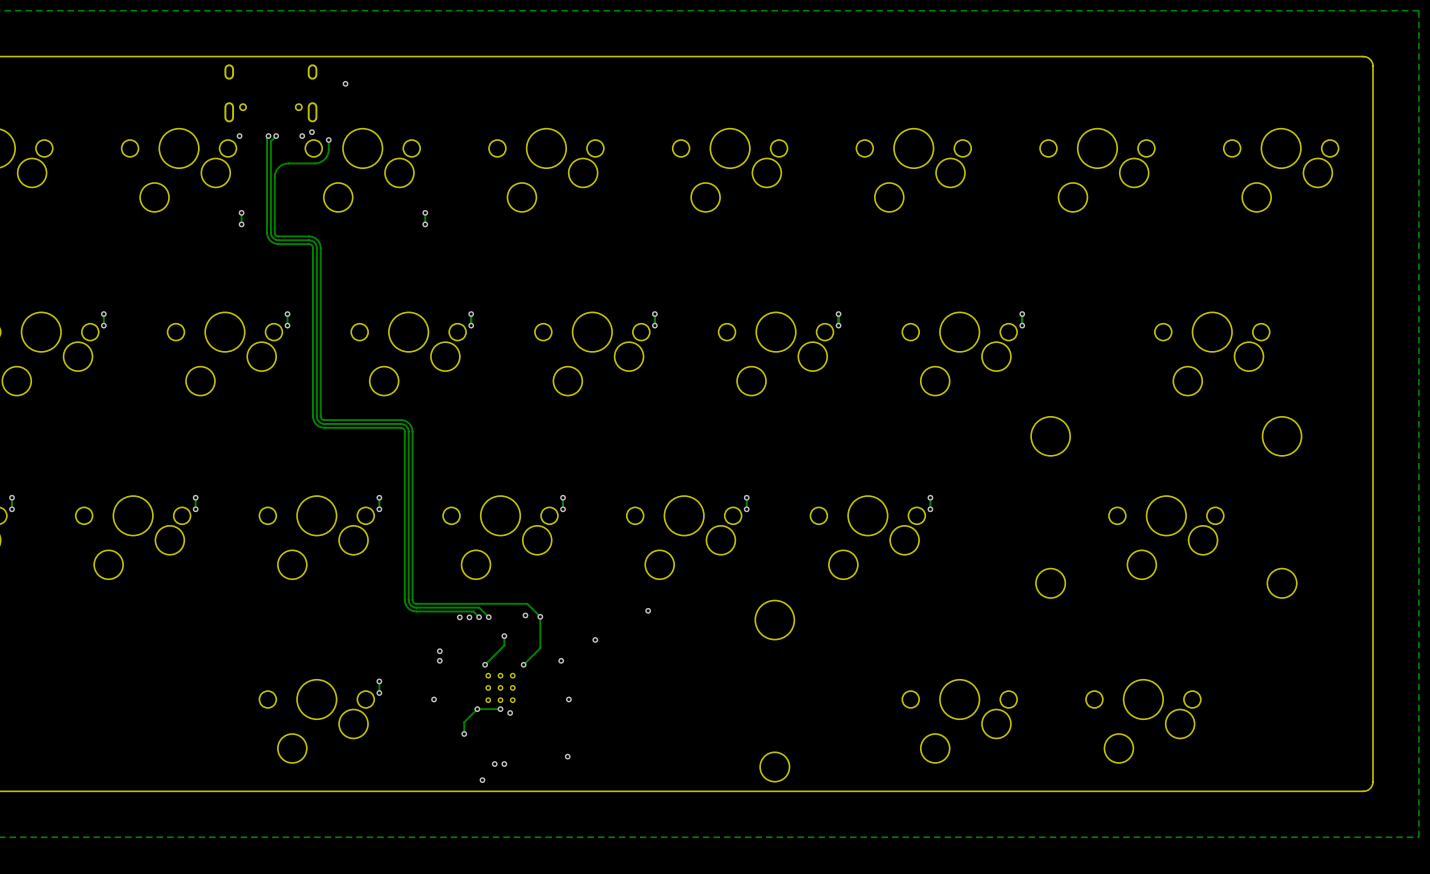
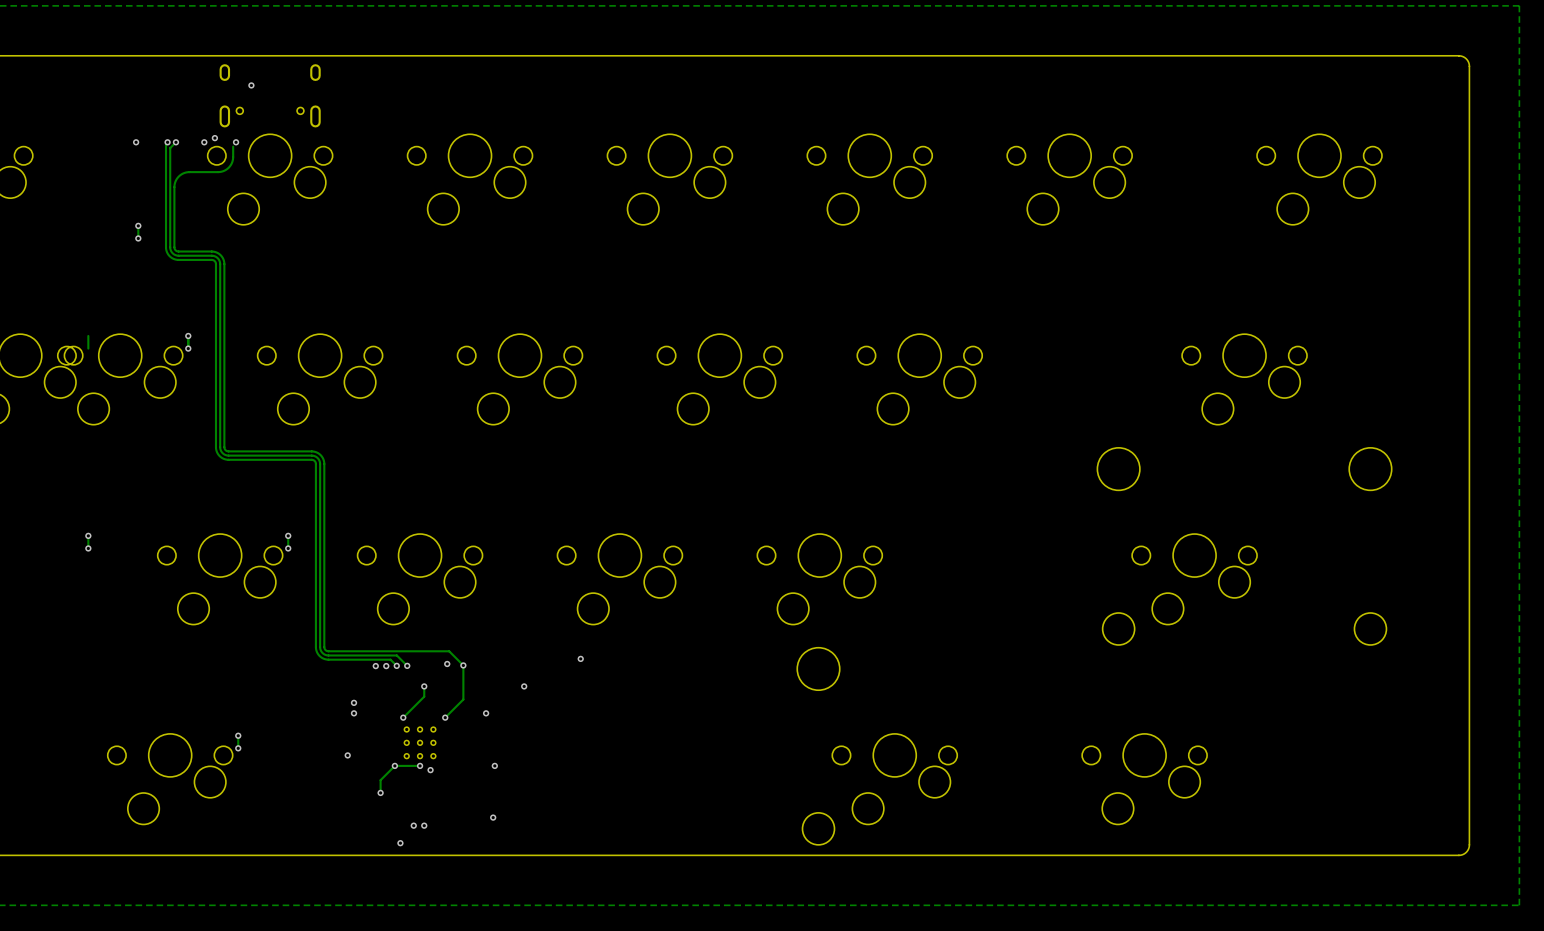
via: none -> (251, 85)
via: (345, 83) -> none
via: none -> (214, 138)
via: (311, 132) -> none
via: none -> (136, 142)
via: none -> (167, 142)
via: none -> (175, 142)
via: none -> (204, 142)
track: (268, 136) (267, 237) (275, 243) (309, 244) (312, 247) (313, 420) (317, 425) (323, 427) (403, 429) (405, 604) (409, 609) (414, 611) (473, 611) (479, 617) -> (167, 142) (166, 143) (166, 252) (175, 259) (212, 259) (215, 263) (216, 452) (220, 457) (226, 459) (311, 459) (315, 461) (316, 651) (320, 657) (326, 659) (390, 659) (396, 665)
via: (268, 136) -> none
track: (276, 136) (270, 141) (271, 235) (277, 240) (311, 240) (316, 247) (317, 419) (323, 423) (400, 423) (407, 426) (408, 431) (409, 602) (415, 607) (479, 607) (488, 617) -> (175, 142) (170, 148) (170, 250) (177, 255) (213, 256) (220, 263) (220, 450) (227, 455) (311, 455) (318, 458) (320, 464) (320, 650) (327, 655) (396, 655) (407, 665)
via: (276, 136) -> none
via: (302, 136) -> none
track: (328, 140) (327, 154) (322, 161) (316, 163) (285, 163) (276, 169) (274, 177) (274, 233) (278, 236) (312, 236) (317, 239) (320, 245) (321, 418) (324, 420) (402, 420) (407, 422) (411, 427) (412, 599) (416, 603) -> (233, 146) (232, 162) (226, 169) (219, 172) (184, 172) (177, 177) (174, 187) (175, 249) (178, 251) (215, 251) (221, 256) (224, 262) (224, 448) (228, 451) (313, 451) (322, 457) (324, 464) (325, 650) (428, 651)
via: (328, 140) -> none
part: (179, 170) -> none
part: none -> (270, 179)
part: (362, 170) -> none
part: none -> (470, 179)
part: (546, 170) -> none
part: none -> (669, 179)
part: (730, 170) -> none
part: none -> (869, 179)
part: (913, 170) -> none
part: none -> (1069, 179)
part: (1097, 170) -> none
part position: (1281, 170) -> (1319, 179)
via: none -> (138, 225)
track: (241, 212) (241, 224) -> (138, 225) (138, 238)
via: (241, 212) -> none
track: (425, 212) (425, 224) -> none
via: (425, 212) -> none
via: none -> (138, 238)
via: (241, 224) -> none
via: (425, 224) -> none
via: (103, 314) -> none
via: none -> (188, 335)
track: (287, 314) (287, 325) -> (188, 335) (188, 348)
via: (287, 314) -> none
track: (471, 314) (471, 325) -> none
via: (471, 314) -> none
track: (654, 314) (654, 325) -> none
via: (654, 314) -> none
track: (838, 314) (838, 325) -> none
via: (838, 314) -> none
track: (1022, 314) (1022, 325) -> none
via: (1022, 314) -> none
via: (103, 325) -> none
via: none -> (188, 348)
via: (287, 325) -> none
via: (471, 325) -> none
via: (654, 325) -> none
via: (838, 325) -> none
via: (1022, 325) -> none
part: none -> (120, 379)
part: (224, 353) -> none
part: none -> (320, 379)
part: (408, 353) -> none
part: none -> (519, 379)
part: (592, 353) -> none
part: none -> (719, 379)
part: (776, 353) -> none
part: none -> (919, 379)
part: (959, 353) -> none
part position: (1212, 353) -> (1244, 379)
via: none -> (88, 535)
track: (195, 497) (195, 509) -> (88, 535) (88, 548)
via: (195, 497) -> none
via: none -> (288, 535)
track: (379, 497) (379, 509) -> (288, 535) (288, 548)
via: (379, 497) -> none
track: (563, 497) (563, 509) -> none
via: (563, 497) -> none
track: (746, 497) (746, 509) -> none
via: (746, 497) -> none
track: (930, 497) (930, 509) -> none
via: (930, 497) -> none
via: none -> (88, 548)
via: (195, 509) -> none
via: none -> (288, 548)
via: (379, 509) -> none
via: (563, 509) -> none
via: (746, 509) -> none
via: (930, 509) -> none
part: (133, 537) -> none
part: none -> (220, 579)
part: (316, 537) -> none
part: none -> (420, 579)
part: (500, 537) -> none
part: none -> (619, 579)
part: (684, 537) -> none
part: none -> (819, 579)
part: (867, 537) -> none
part position: (1166, 537) -> (1194, 579)
track: (435, 603) (527, 603) (540, 616) (540, 648) (523, 664) -> (449, 651) (463, 665) (463, 699) (445, 717)
via: none -> (580, 658)
via: (648, 610) -> none
via: none -> (447, 663)
via: (525, 615) -> none
via: none -> (463, 665)
via: (540, 616) -> none
via: none -> (375, 666)
via: none -> (386, 666)
via: none -> (396, 665)
via: none -> (407, 665)
via: (459, 617) -> none
via: (469, 617) -> none
via: (479, 617) -> none
via: (488, 617) -> none
via: none -> (424, 686)
track: (504, 636) (504, 645) (485, 664) -> (424, 686) (424, 696) (403, 717)
via: (595, 639) -> none
via: none -> (354, 702)
via: (439, 651) -> none
via: none -> (354, 713)
via: (439, 660) -> none
via: none -> (486, 713)
via: (561, 660) -> none
via: none -> (403, 717)
via: none -> (445, 717)
via: (485, 664) -> none
via: (523, 664) -> none
via: none -> (238, 735)
track: (379, 681) (379, 692) -> (238, 735) (238, 748)
via: (379, 681) -> none
part position: (500, 687) -> (420, 742)
via: none -> (238, 748)
via: (379, 692) -> none
via: none -> (347, 755)
via: (434, 699) -> none
via: (568, 699) -> none
via: none -> (394, 765)
via: none -> (420, 765)
track: (500, 709) (477, 709) (464, 722) (464, 733) -> (420, 765) (394, 765) (380, 780) (380, 792)
via: (500, 709) -> none
via: none -> (430, 770)
via: (510, 713) -> none
part: none -> (170, 779)
part: (316, 721) -> none
part: none -> (894, 779)
part: (959, 721) -> none
part: none -> (1144, 779)
part: (1143, 721) -> none
via: none -> (380, 792)
via: (464, 733) -> none
via: none -> (493, 817)
via: (567, 756) -> none
via: none -> (413, 825)
via: none -> (424, 825)
via: (494, 764) -> none
via: (504, 764) -> none
via: none -> (400, 843)
via: (482, 780) -> none

